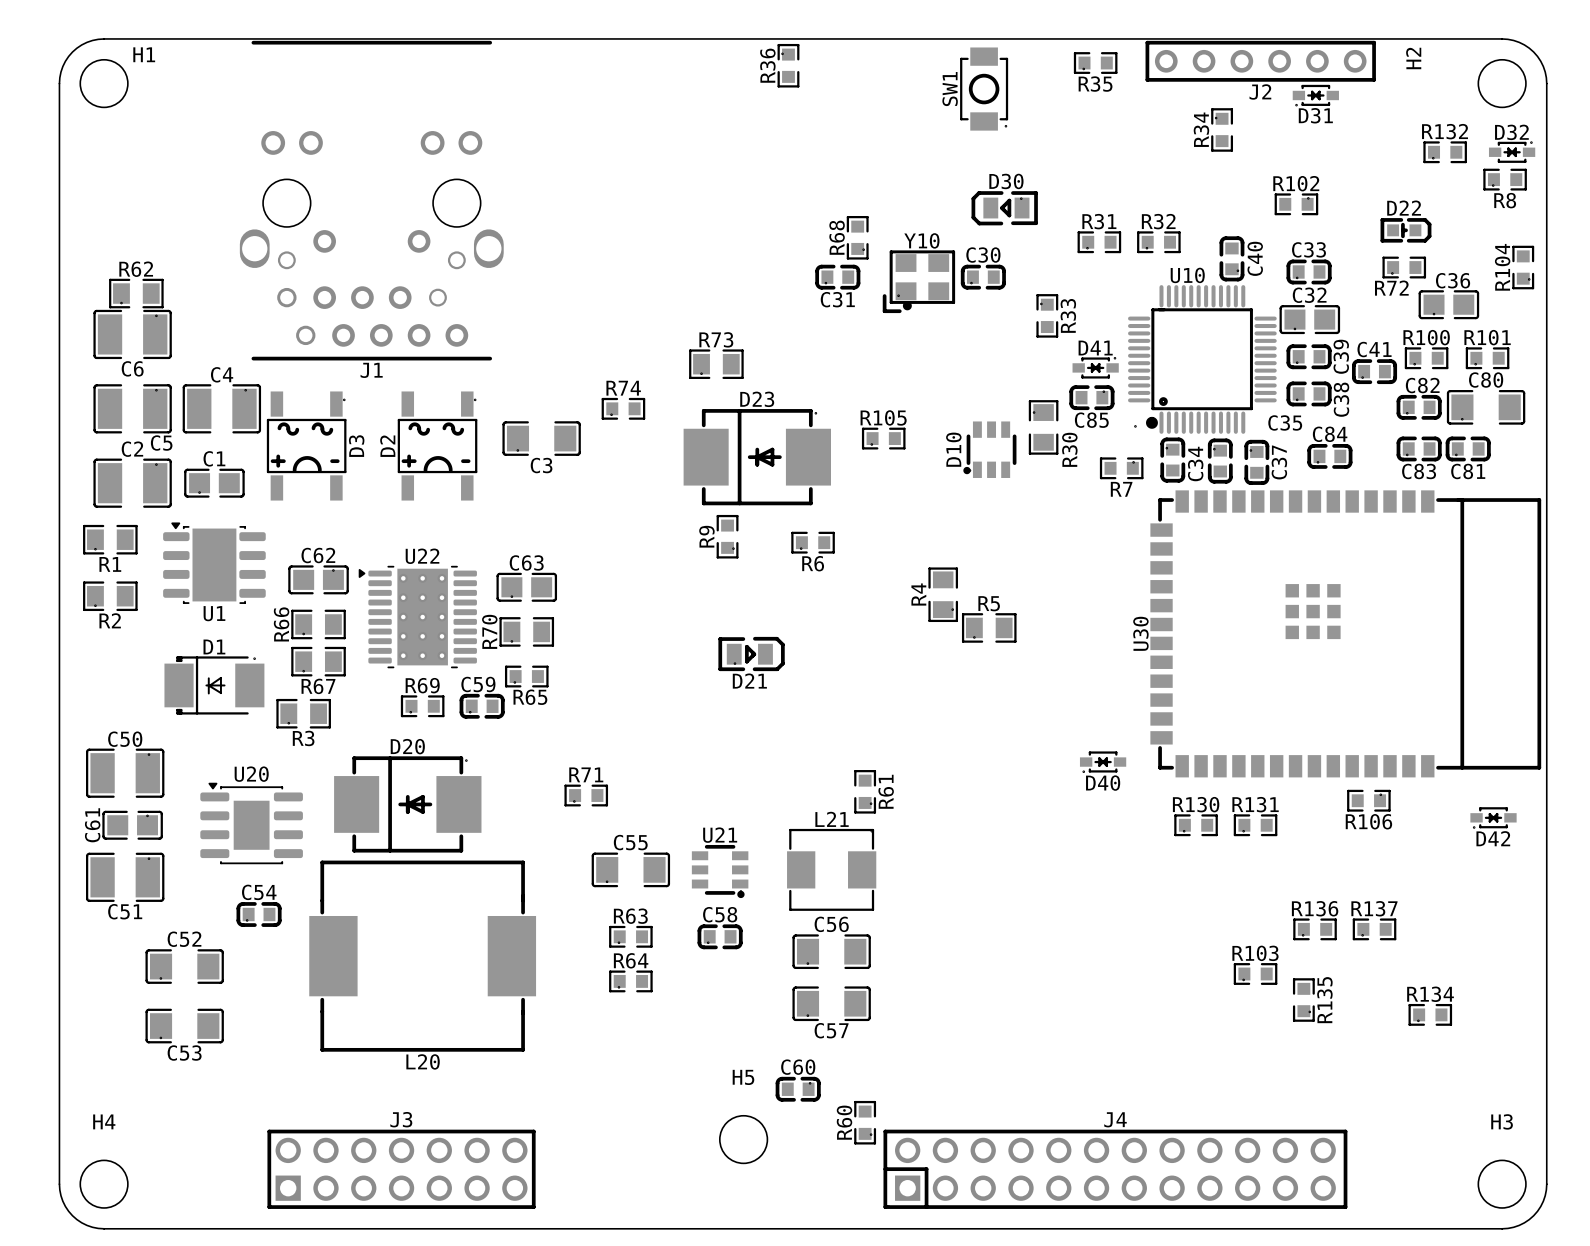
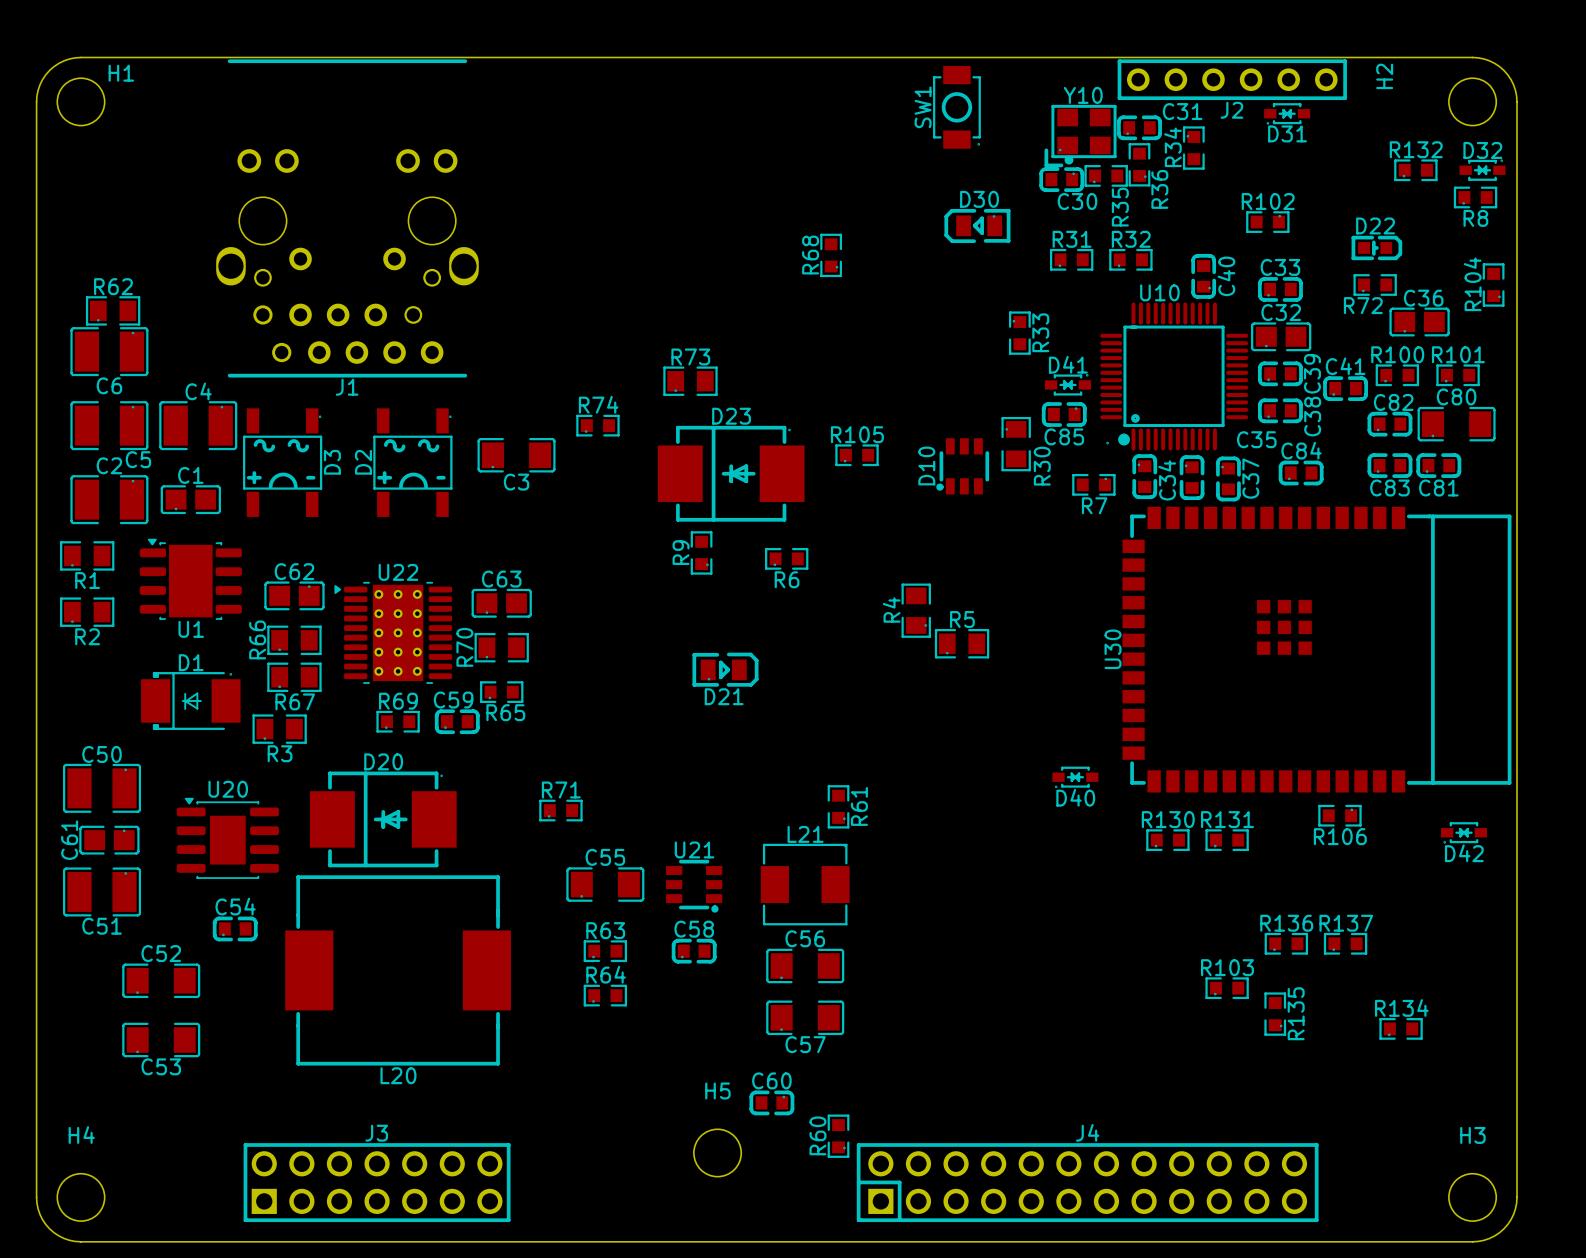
R35 position: (1095, 63) -> (1106, 175)
R36 rotation: 0° (788, 65) -> 180° (1139, 164)
R36 position: (788, 65) -> (1139, 164)
R35 name rotation: 0° (1095, 84) -> 90° counterclockwise (1120, 207)
C31 position: (837, 277) -> (1139, 127)
C30 rotation: 0° (983, 277) -> 180° (1061, 179)
C30 position: (983, 277) -> (1061, 179)
Y10 position: (918, 281) -> (1080, 136)
C31 name position: C31 (837, 299) -> C31 (1182, 111)

